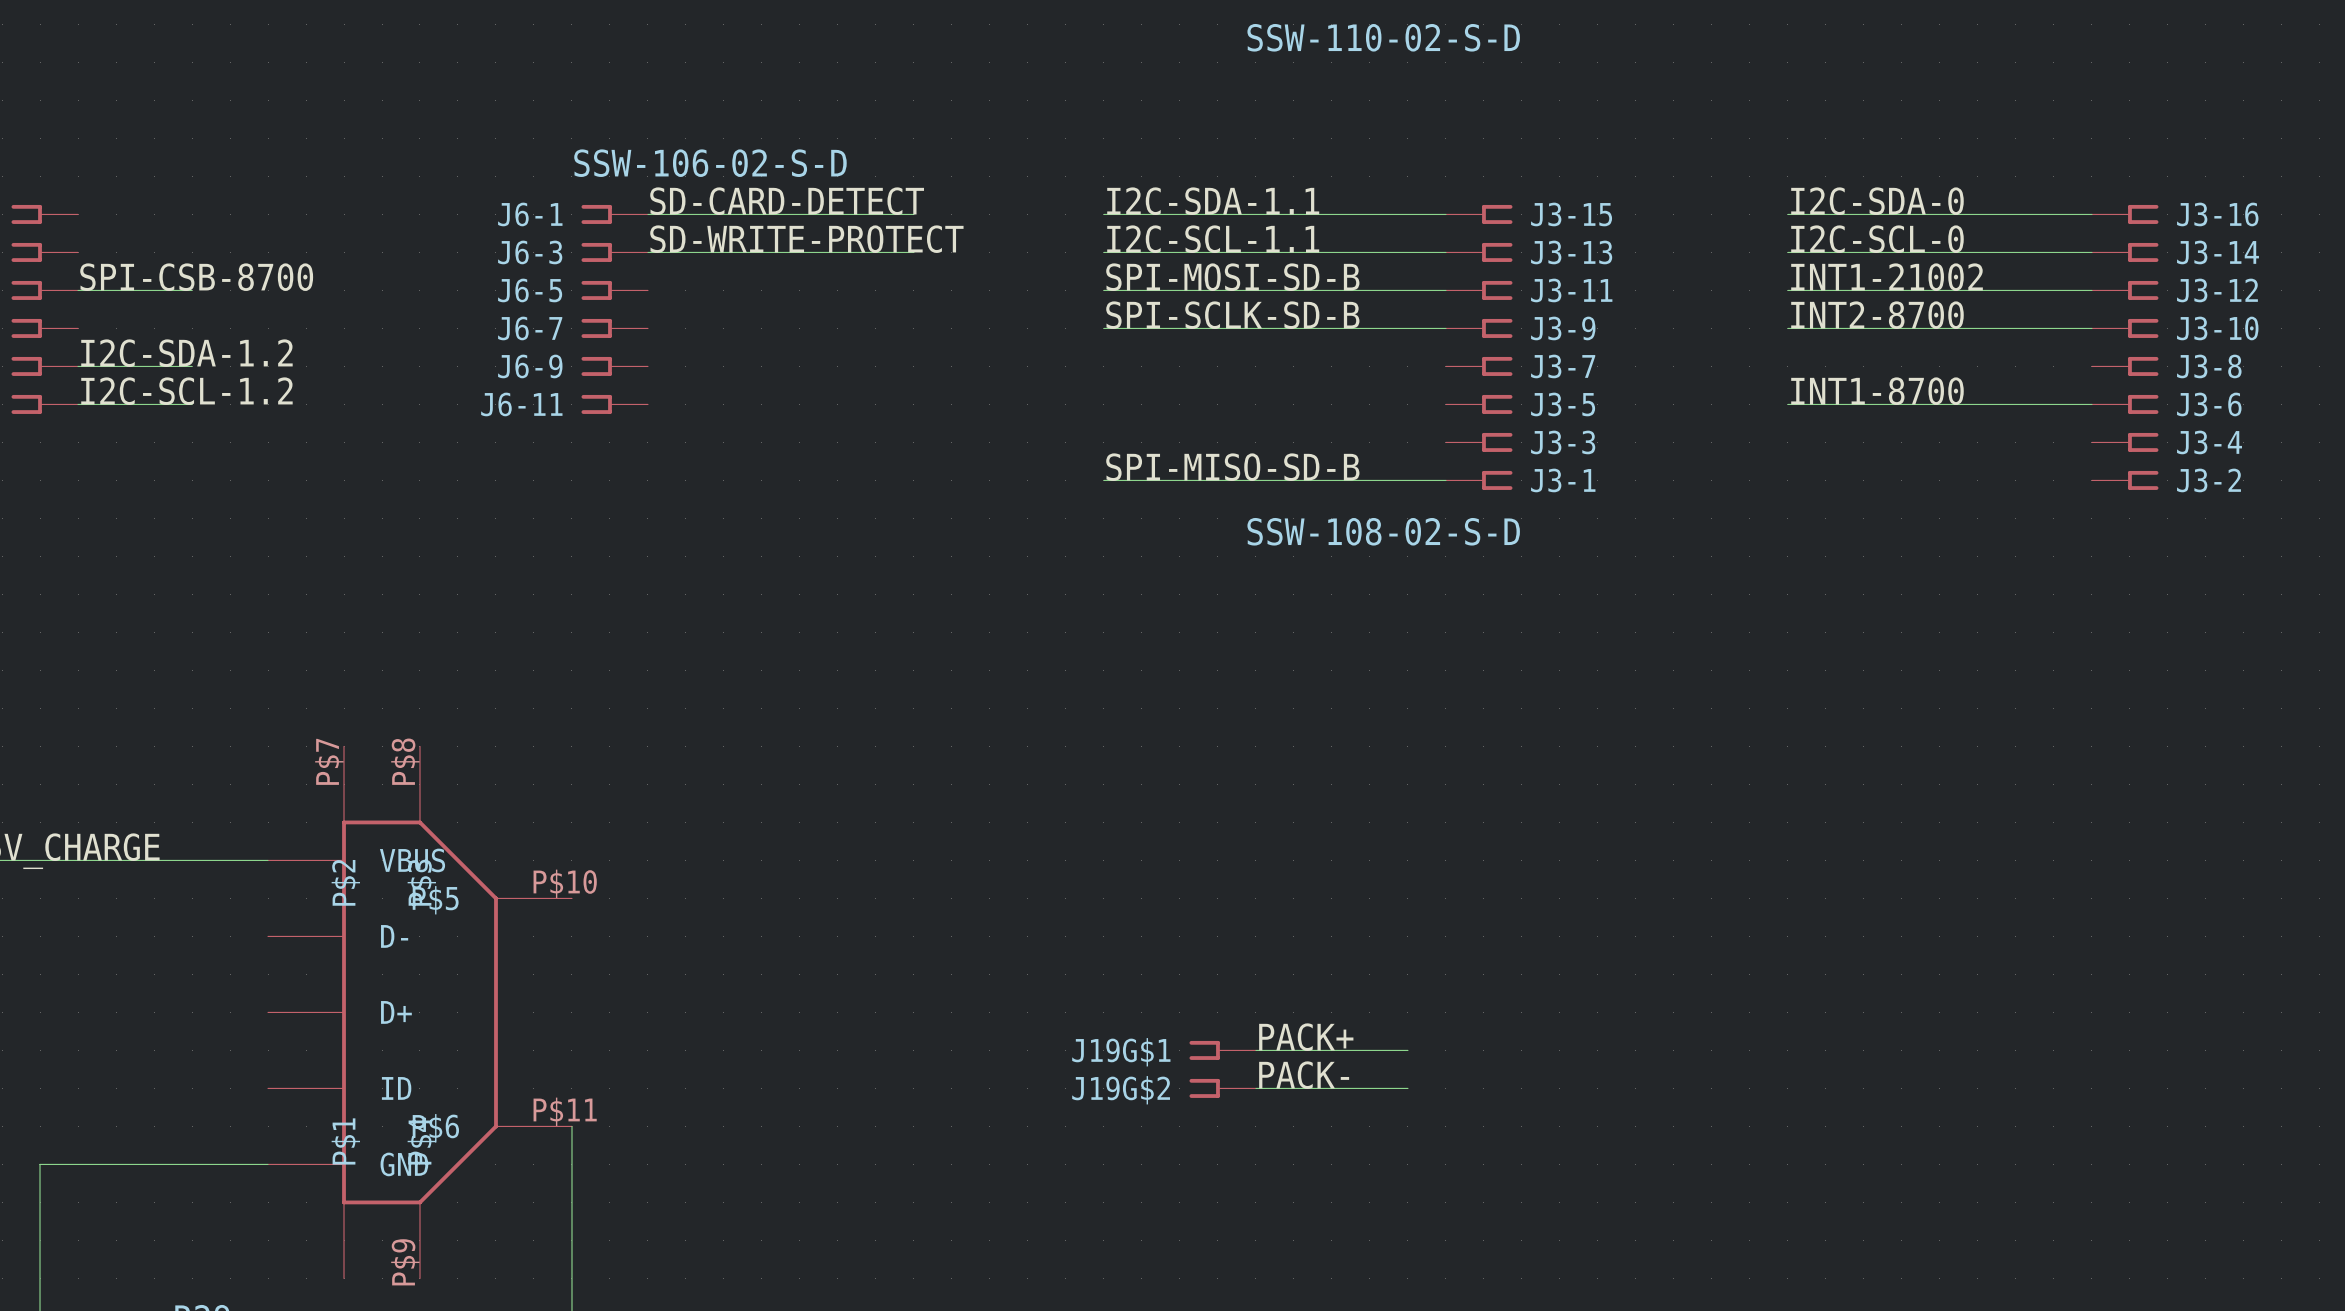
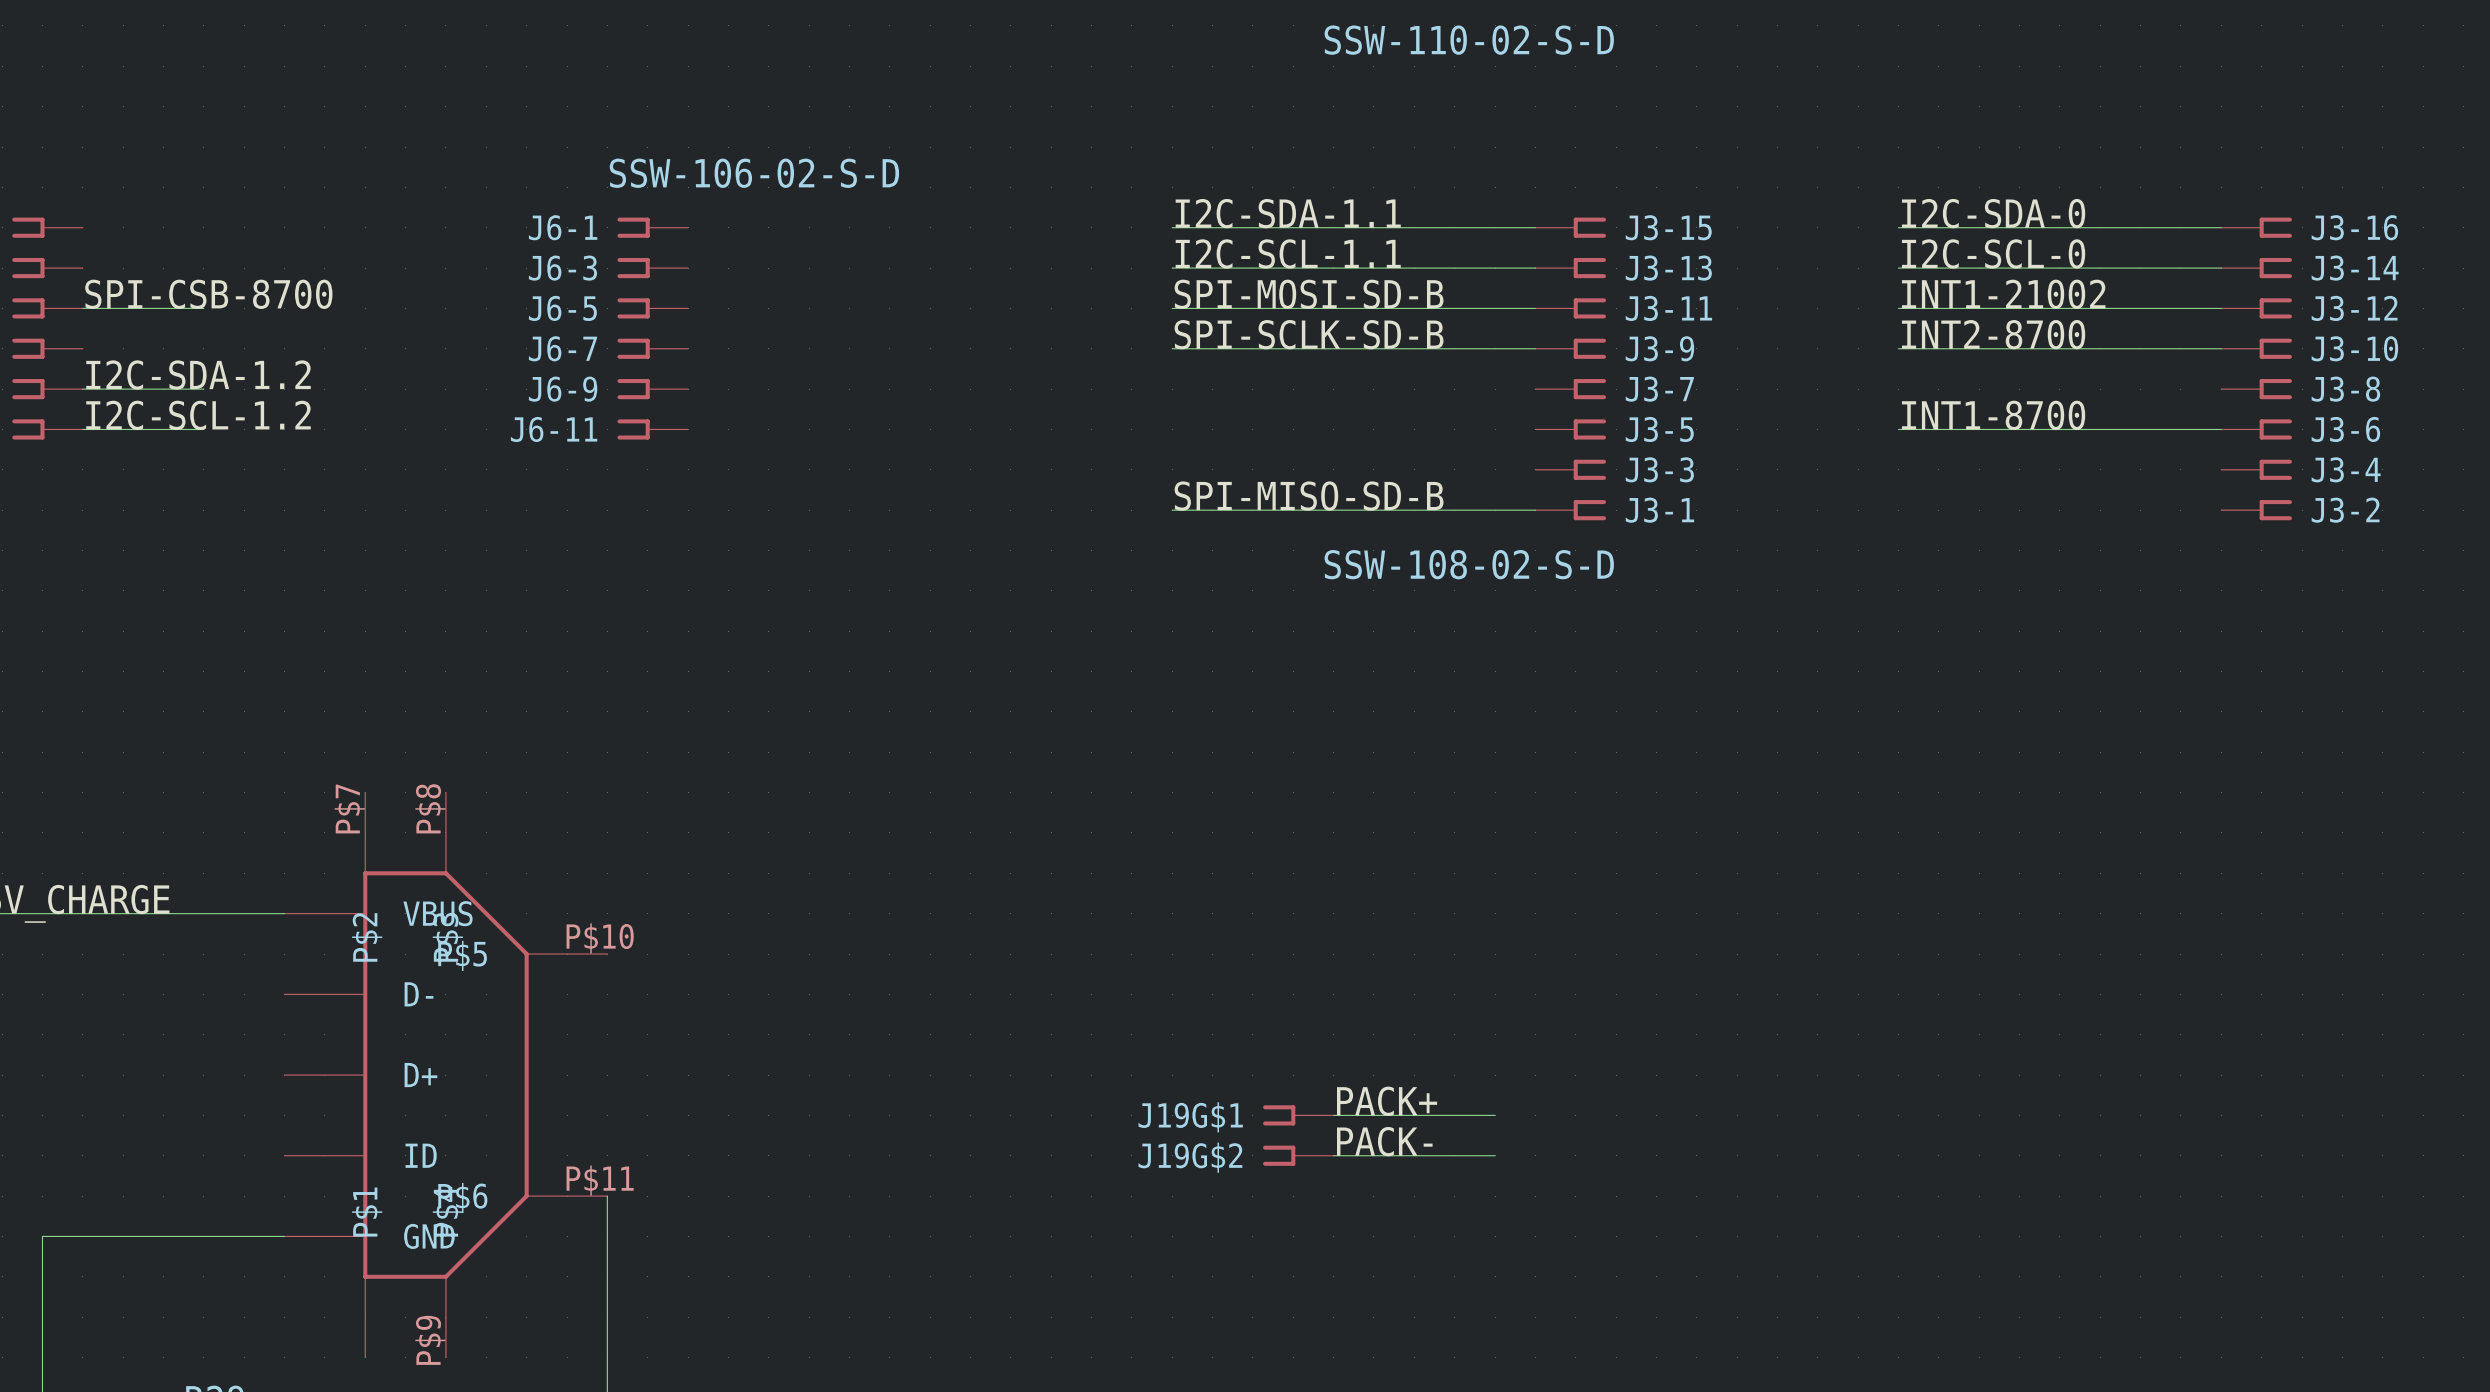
label: SD-CARD-DETECT (787, 201) -> none
wire: (647, 214) (913, 214) -> none
label: SD-WRITE-PROTECT (806, 239) -> none
wire: (647, 252) (913, 252) -> none

